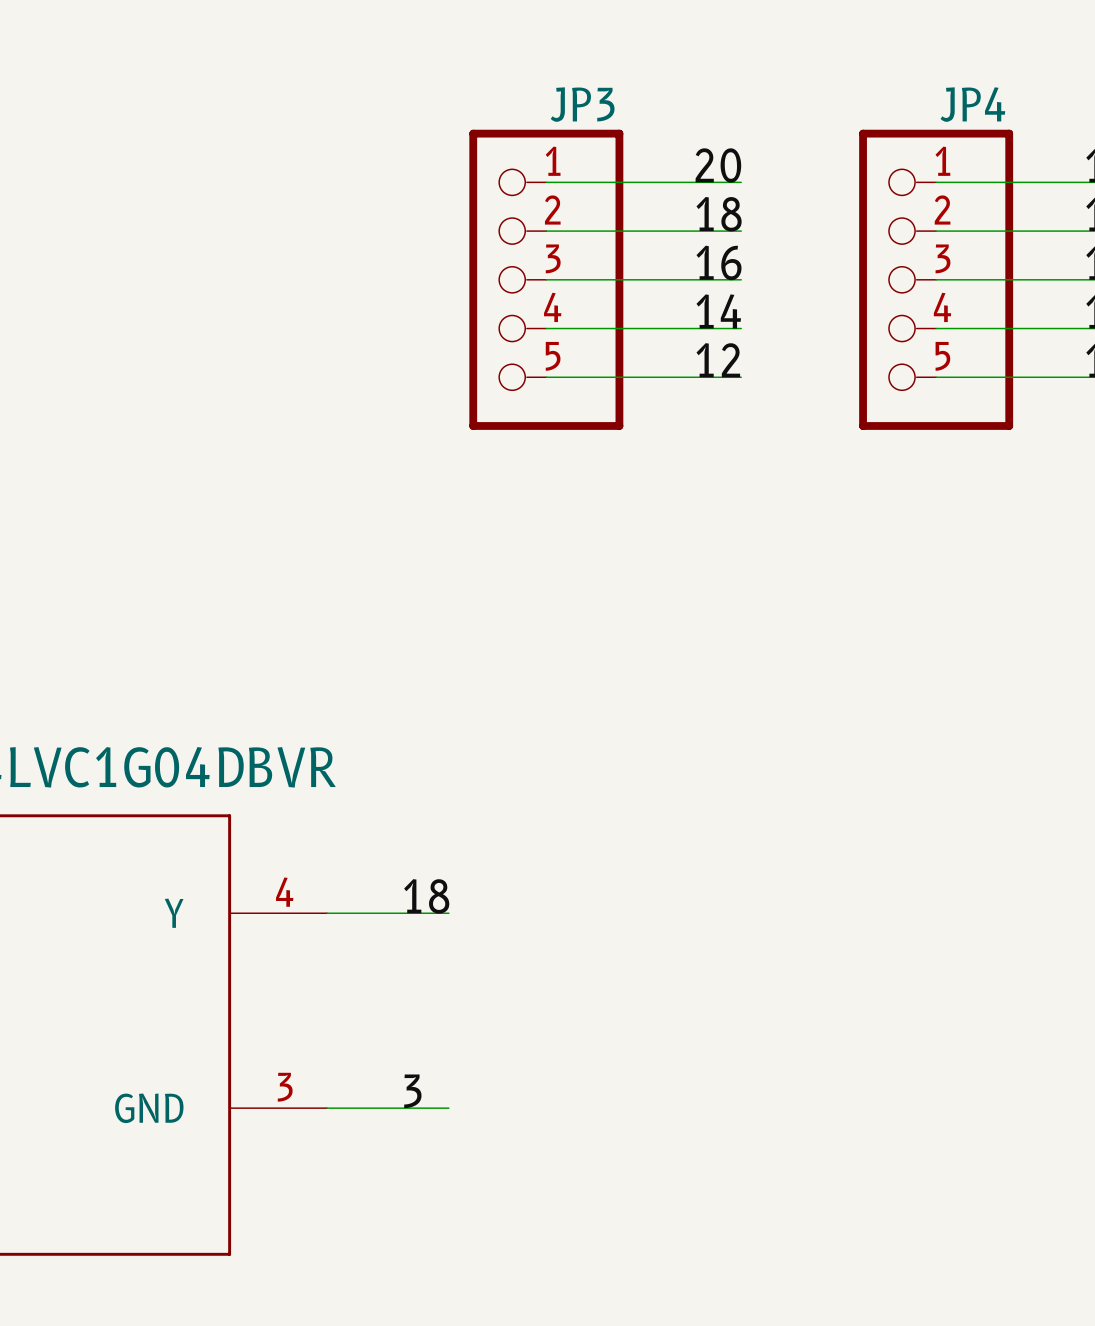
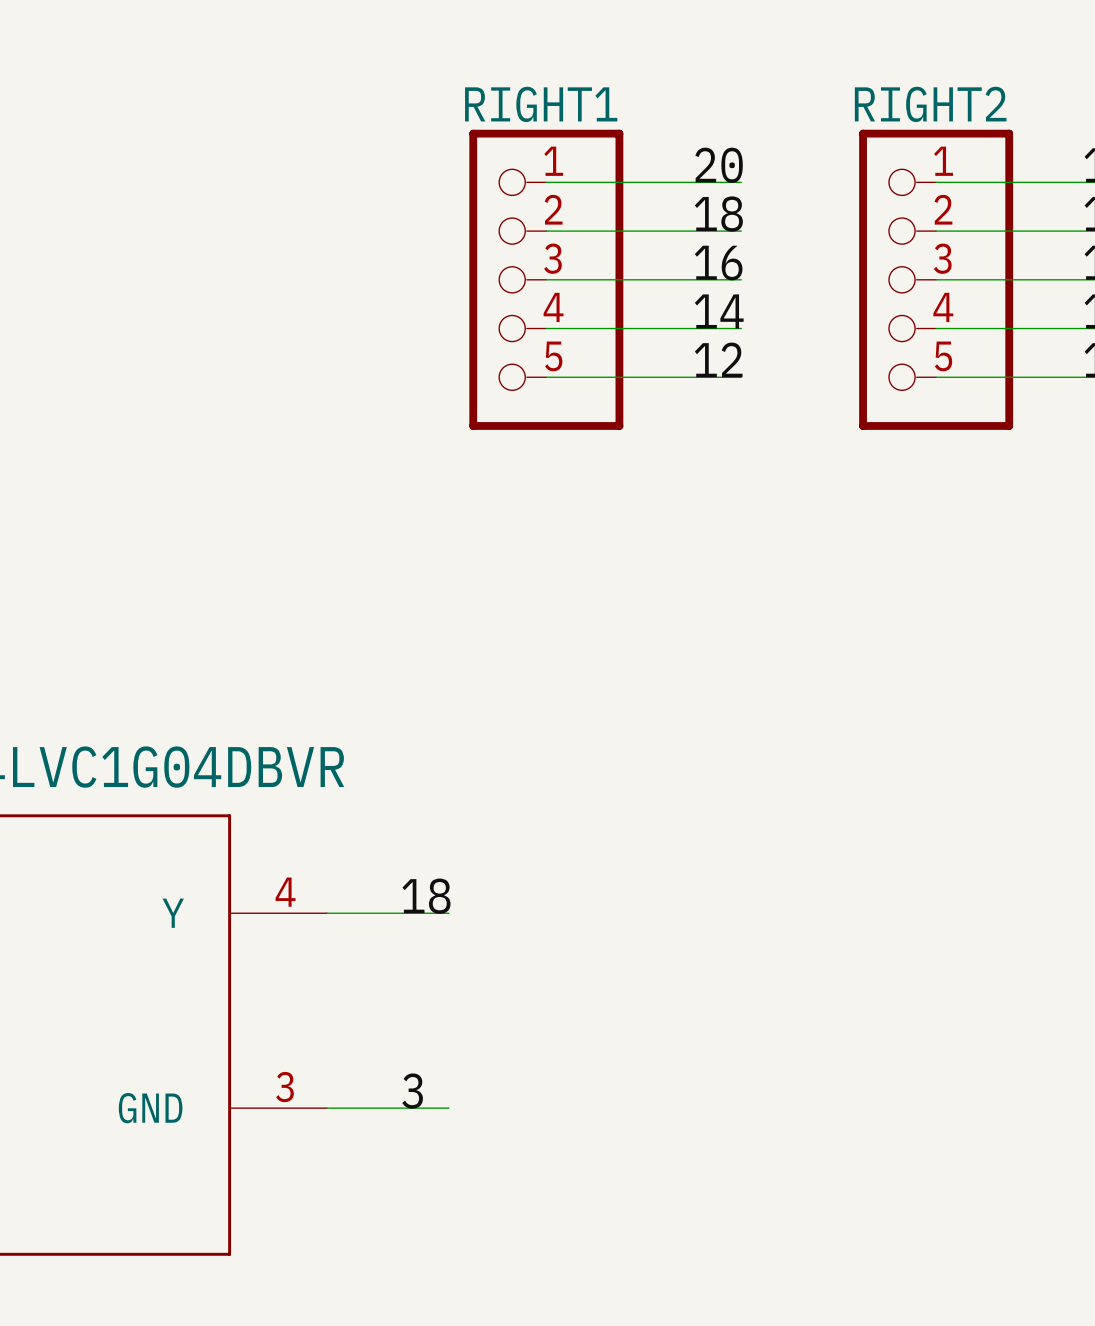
JP3 name: JP3 (582, 104) -> RIGHT1 (541, 104)
JP4 name: JP4 (972, 104) -> RIGHT2 (930, 104)

